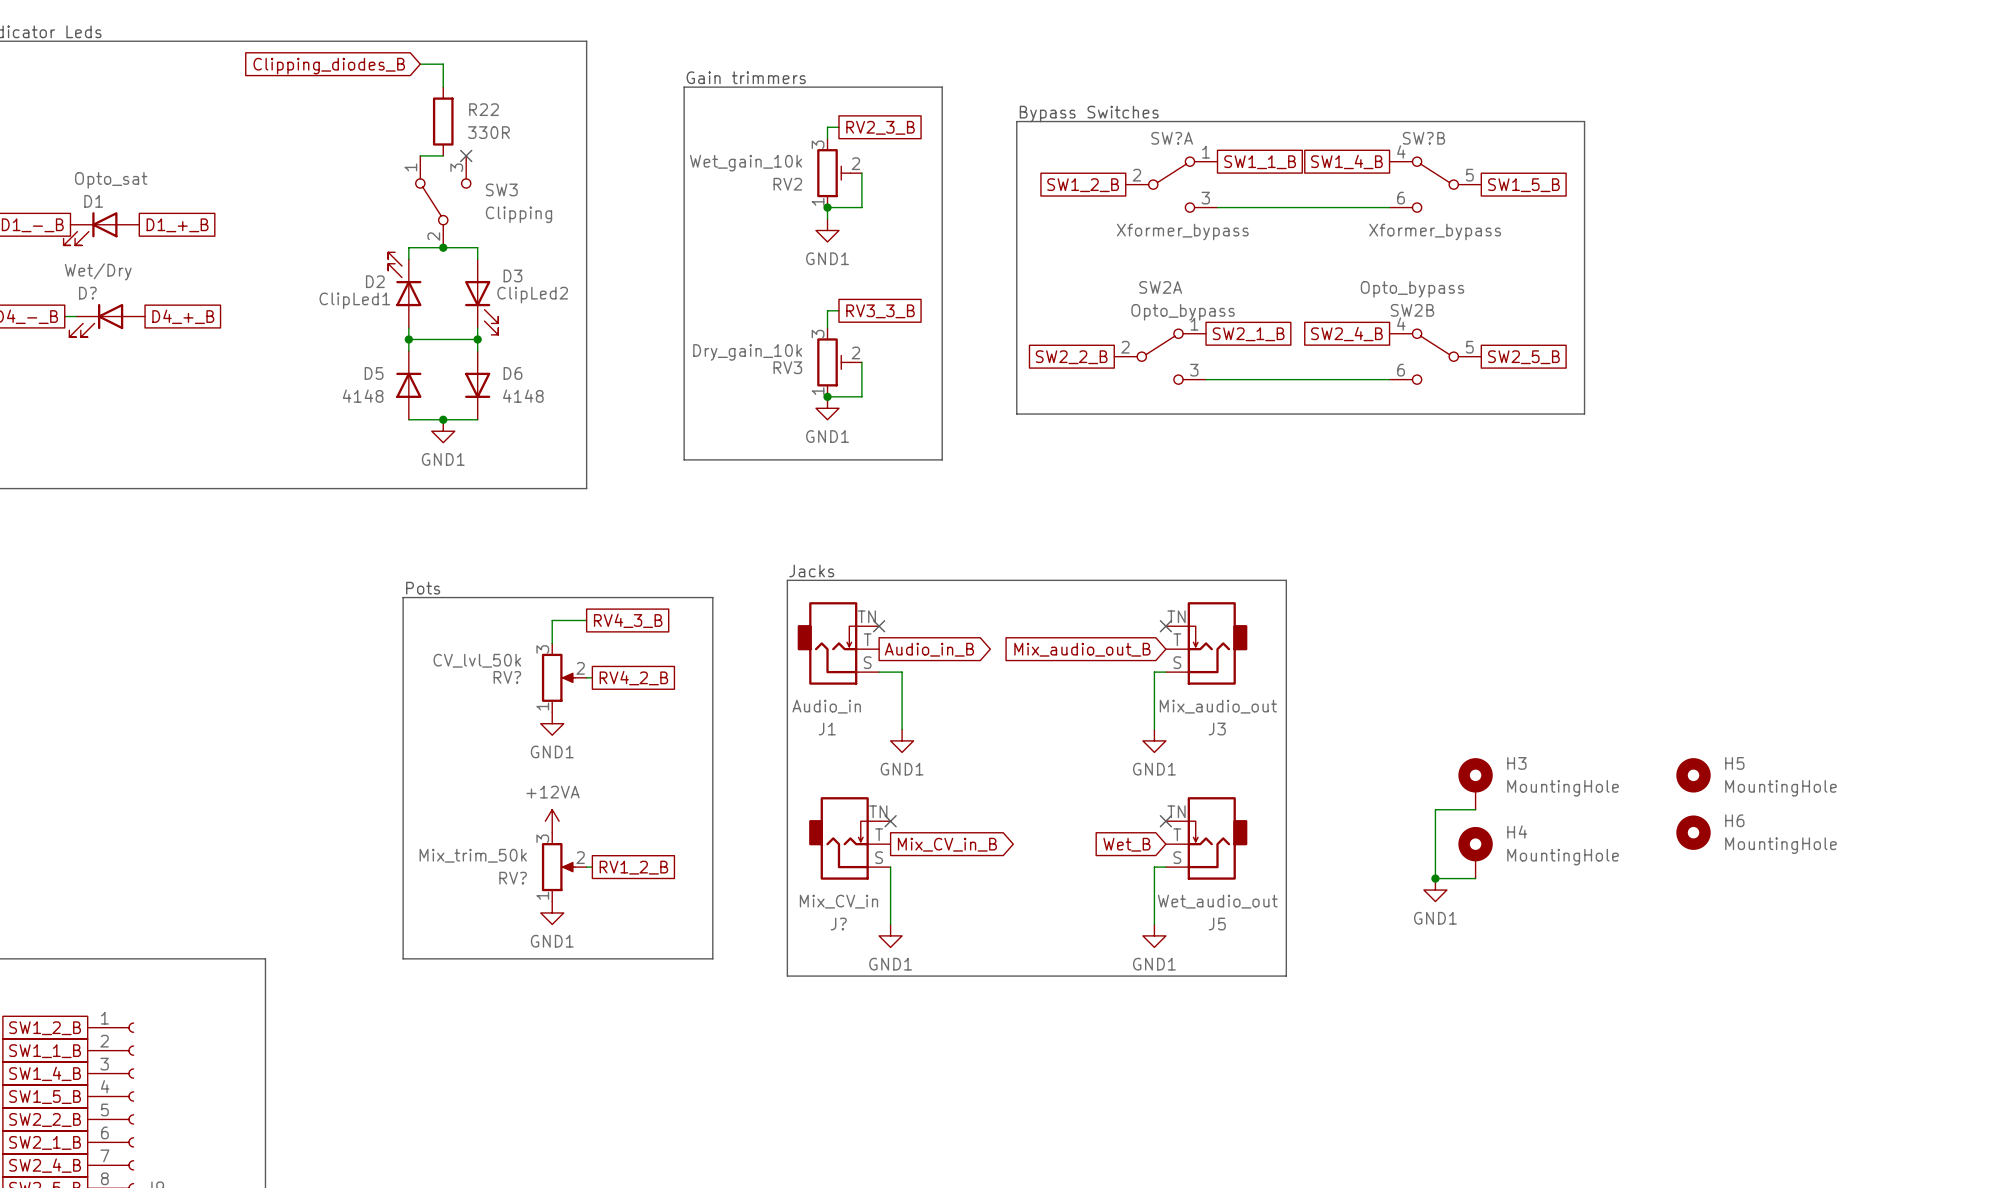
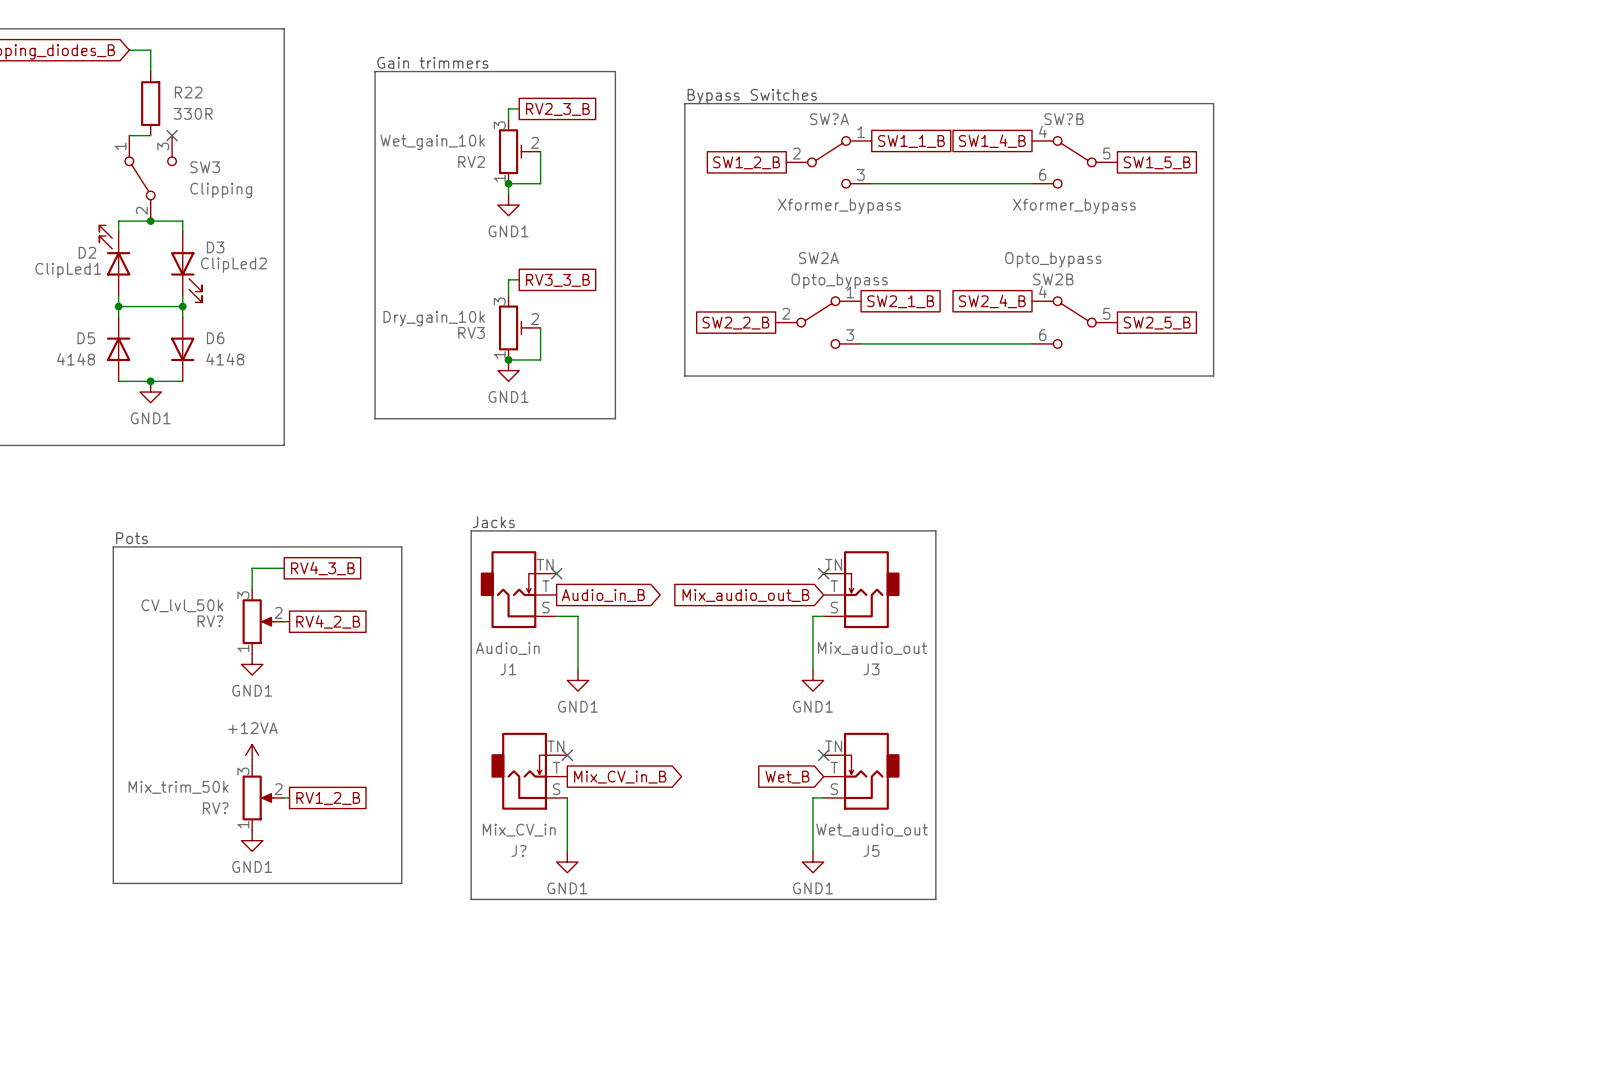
H5: MountingHole (1693, 775) -> none
H3: MountingHole (1475, 783) -> none
wire: (1475, 809) (1435, 809) (1435, 878) (1475, 878) -> none
H6: MountingHole (1693, 832) -> none
H4: MountingHole (1475, 852) -> none
junction: (1435, 878) -> none
power symbol: GND1 (1435, 890) -> none

